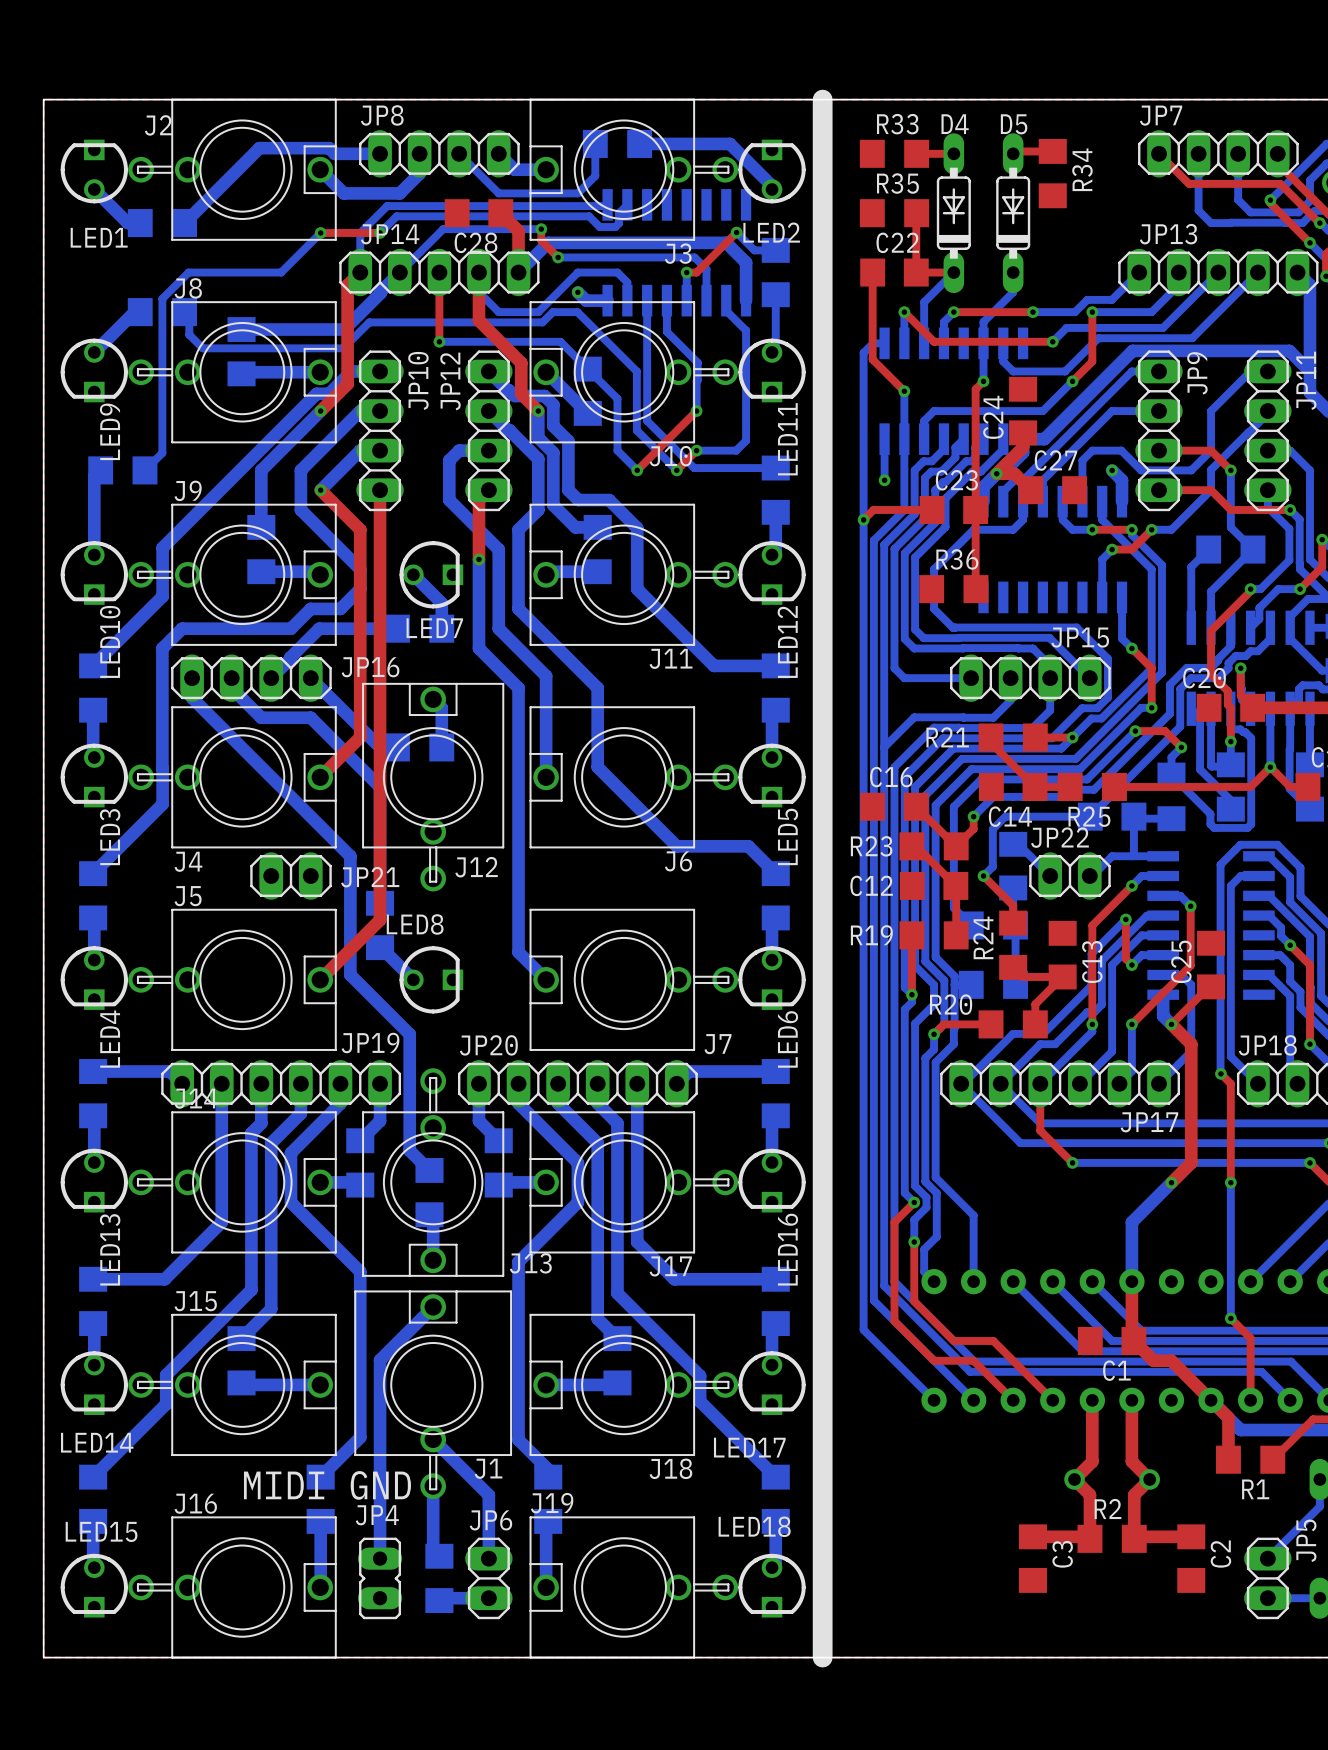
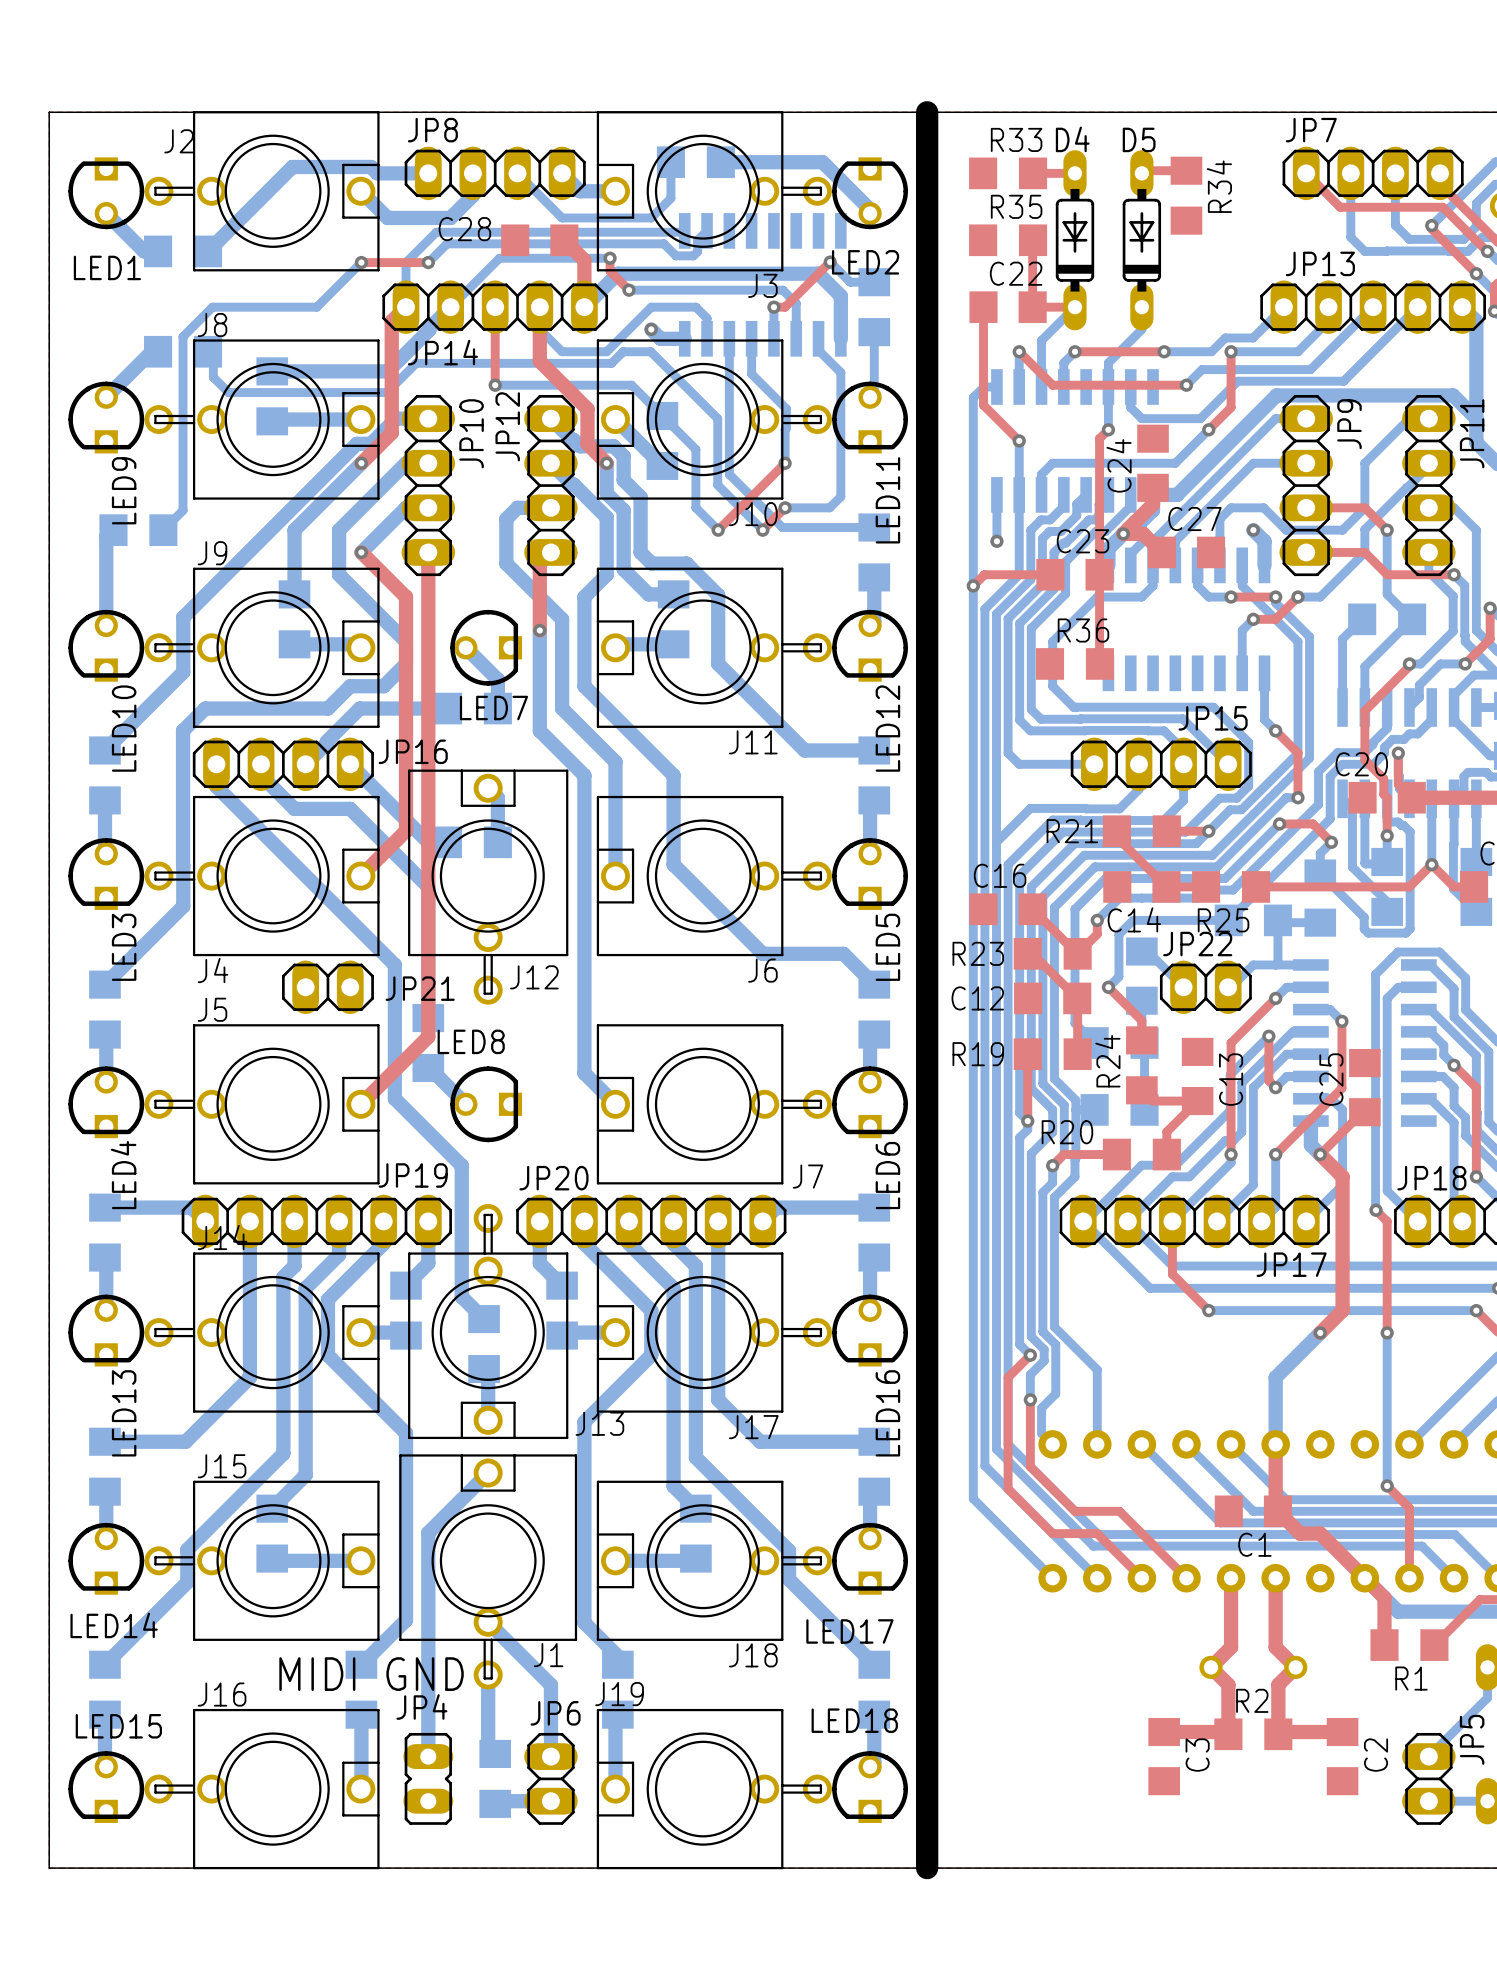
JP14 name position: JP14 (390, 234) -> JP14 (442, 352)
C28 name position: C28 (475, 242) -> C28 (464, 229)

